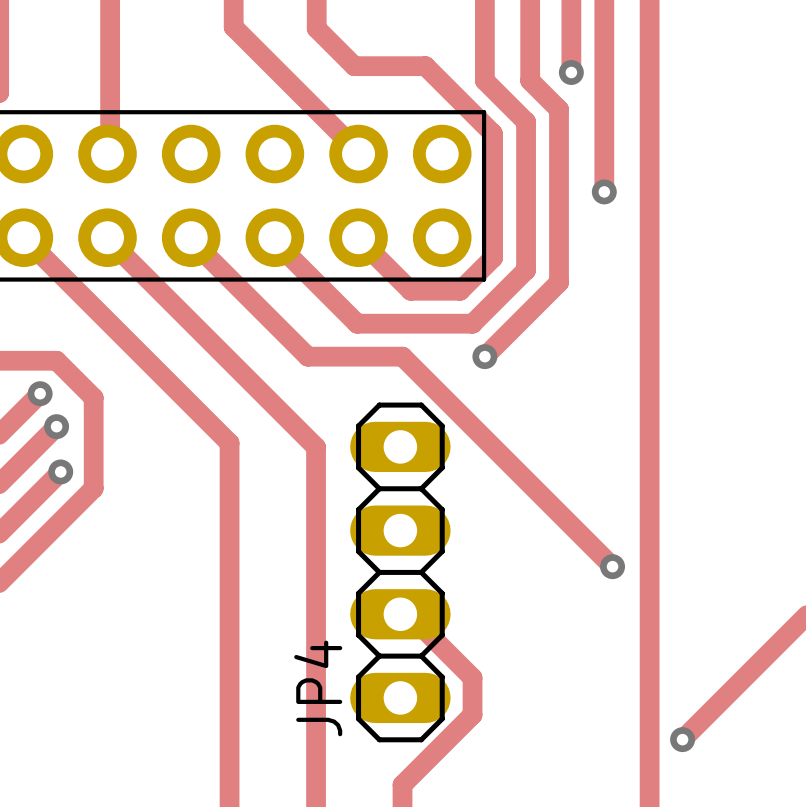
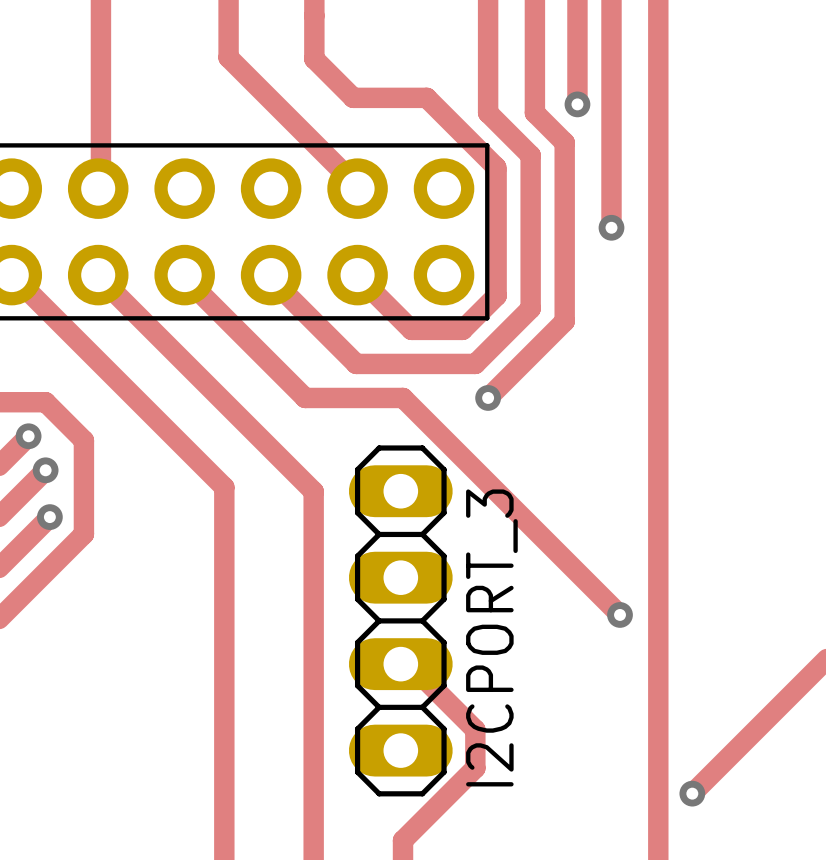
JP4 name: JP4 (318, 688) -> I2CPORT_3 (491, 637)

